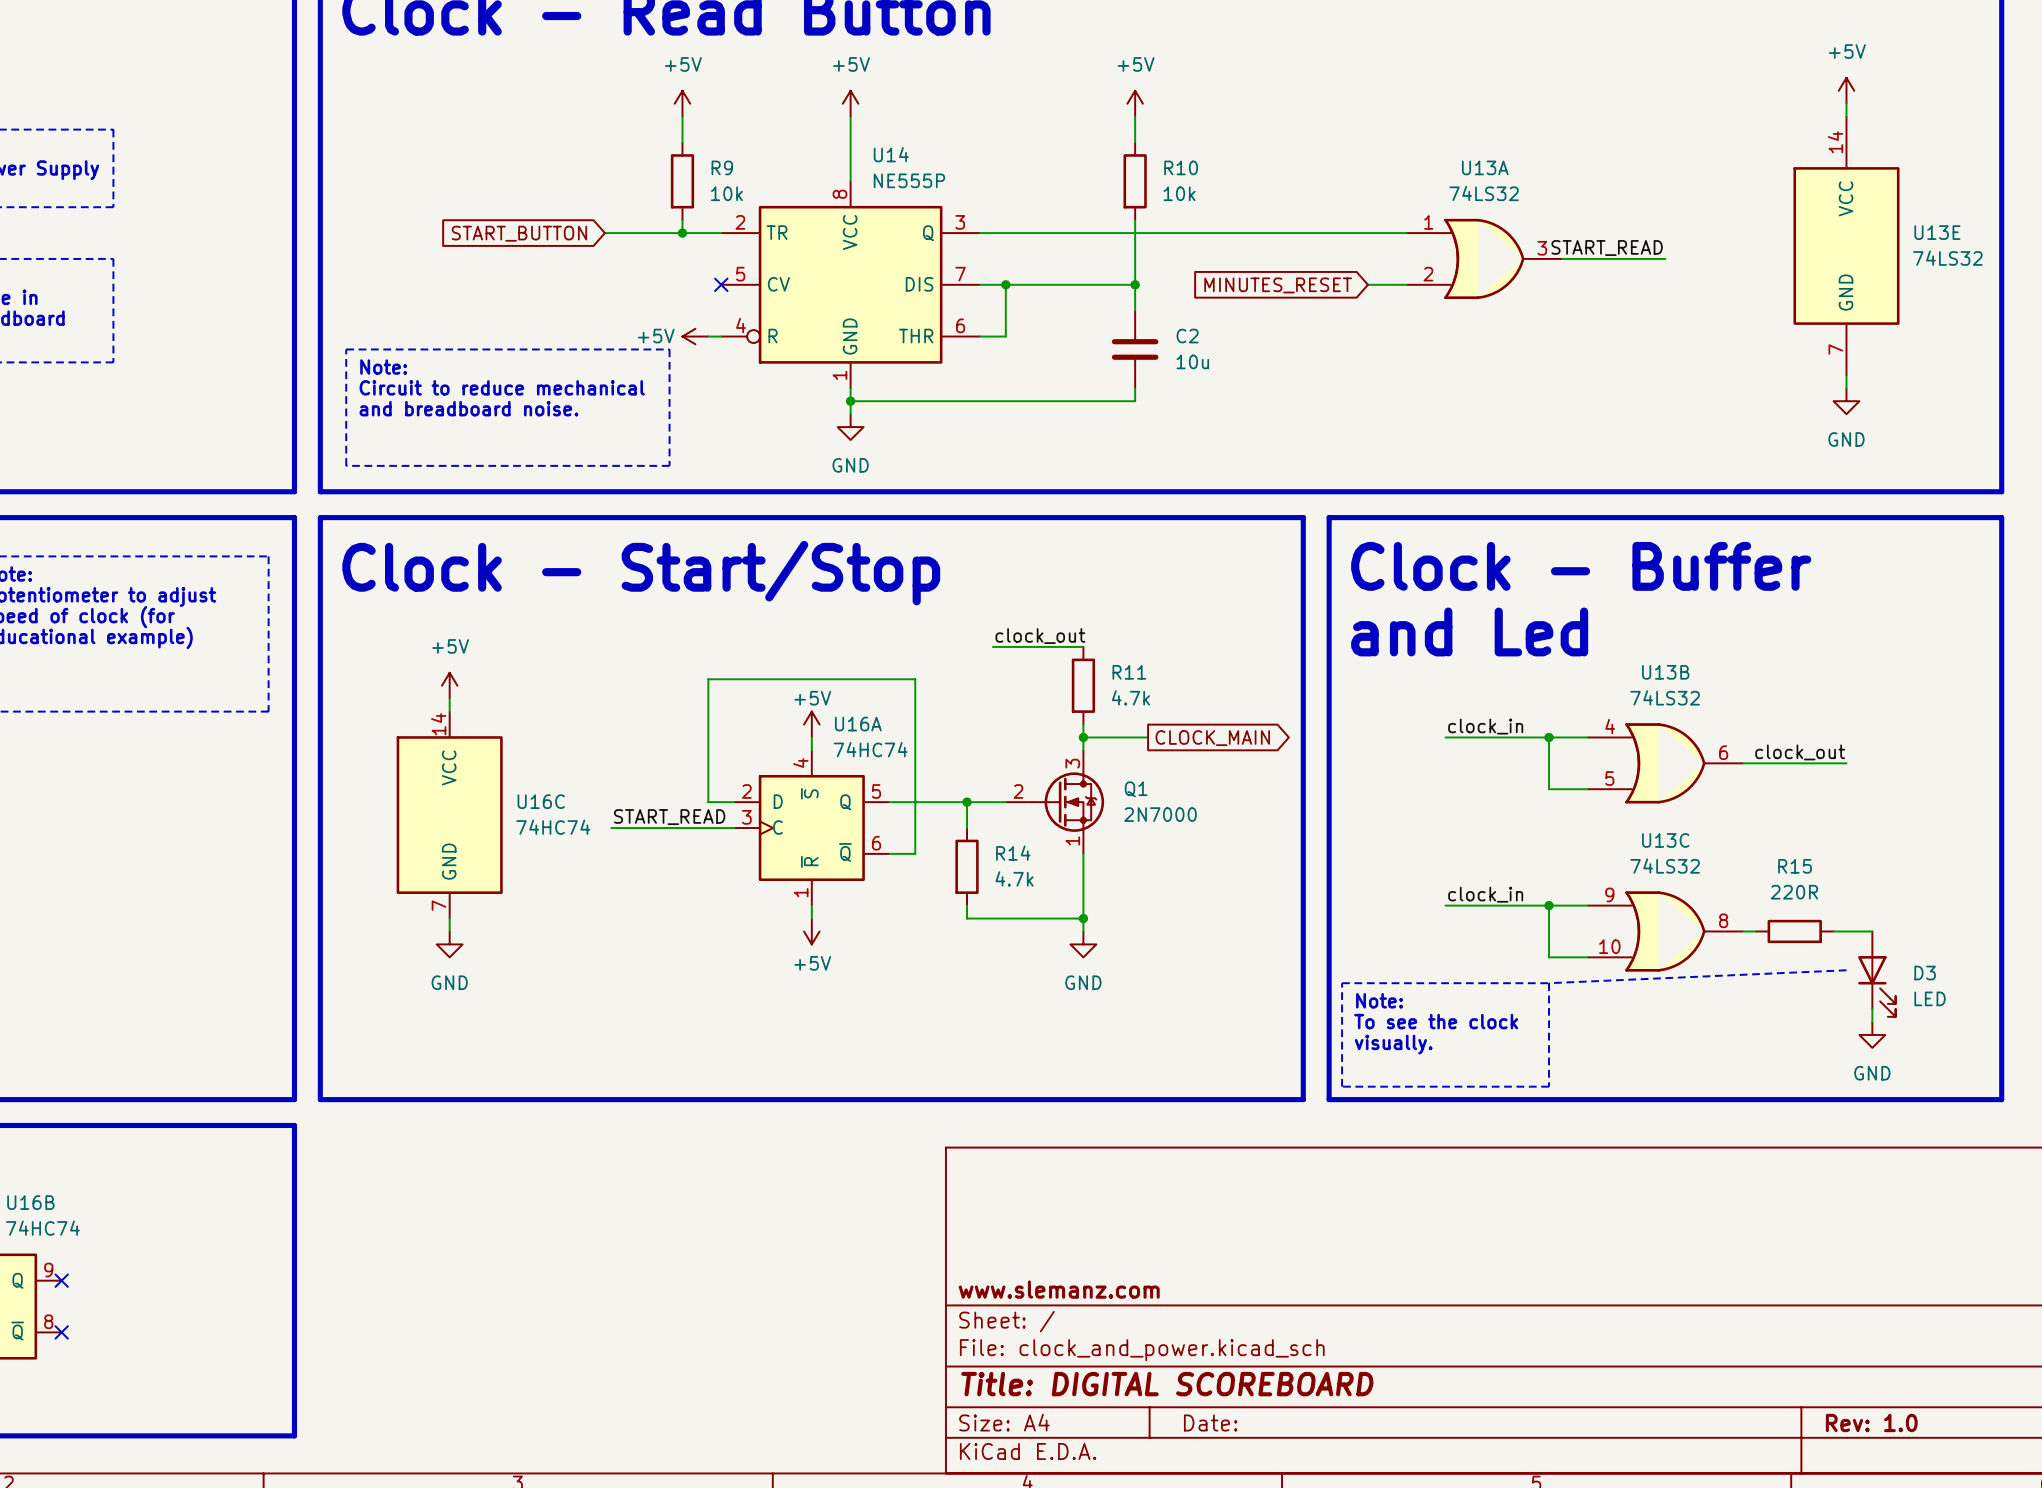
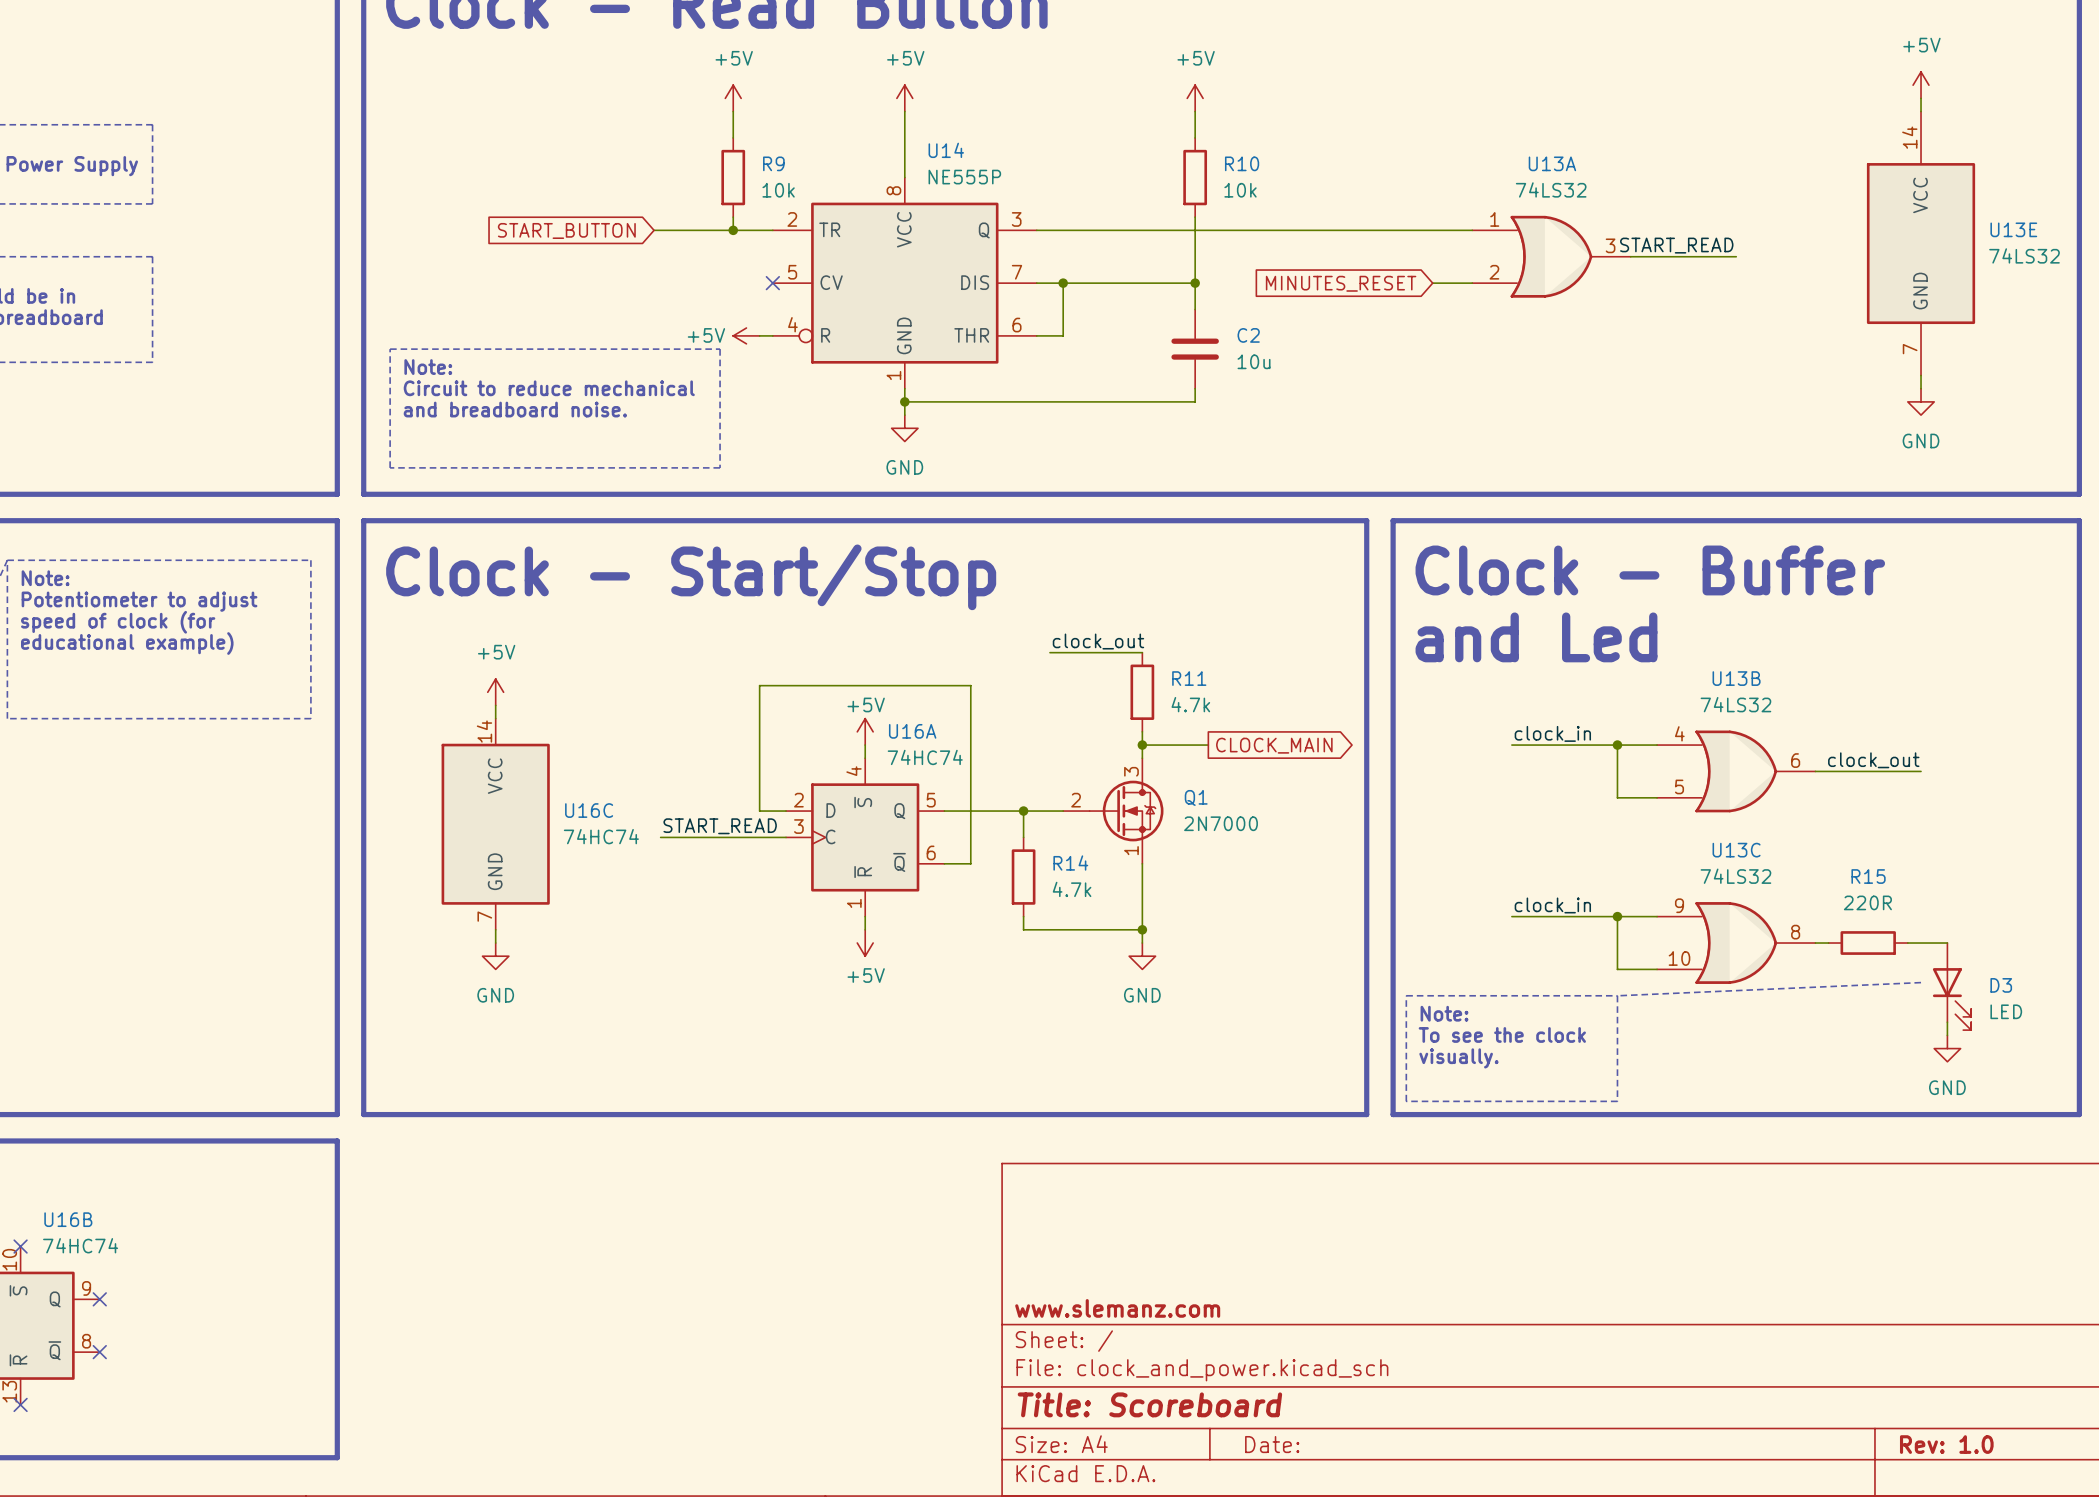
title block: Title: DIGITAL SCOREBOARD (1167, 1384) -> Title: Scoreboard (1149, 1404)

